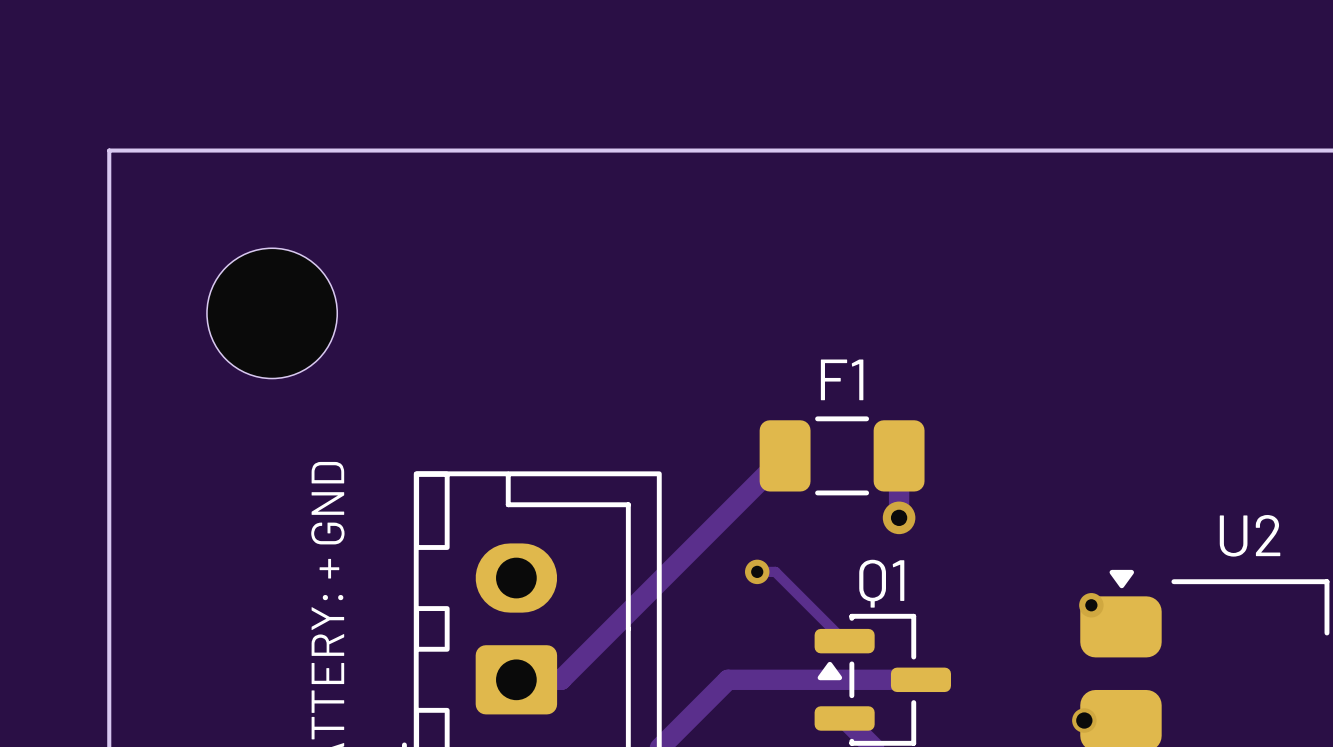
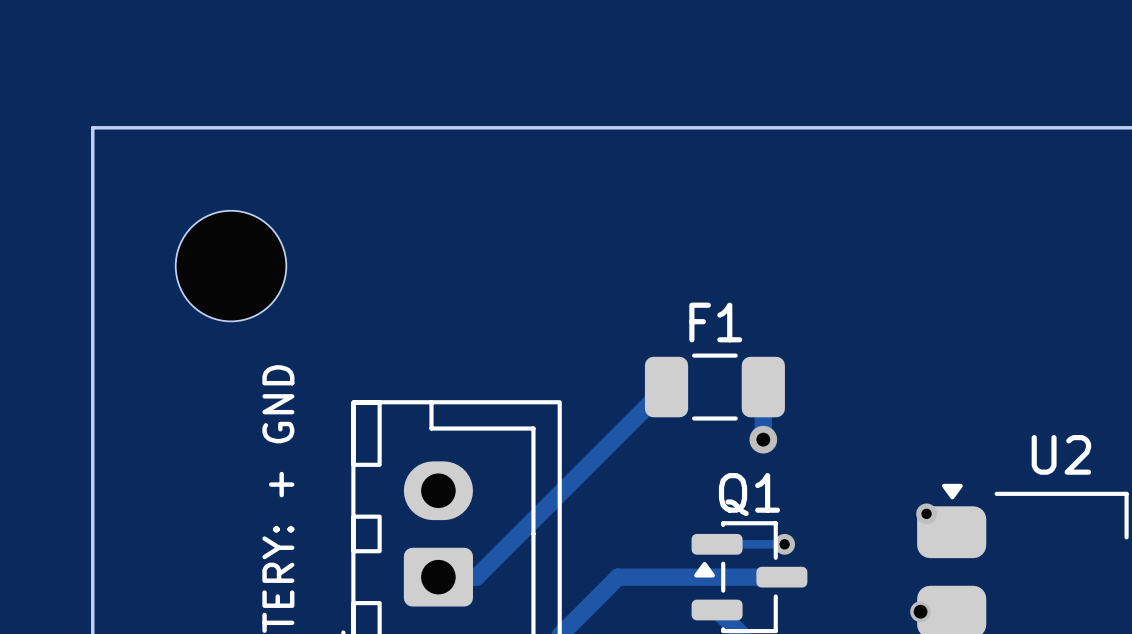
track: (757, 571) (775, 571) (844, 641) -> (784, 544) (717, 544)
via: (757, 571) -> none
via: none -> (784, 544)

